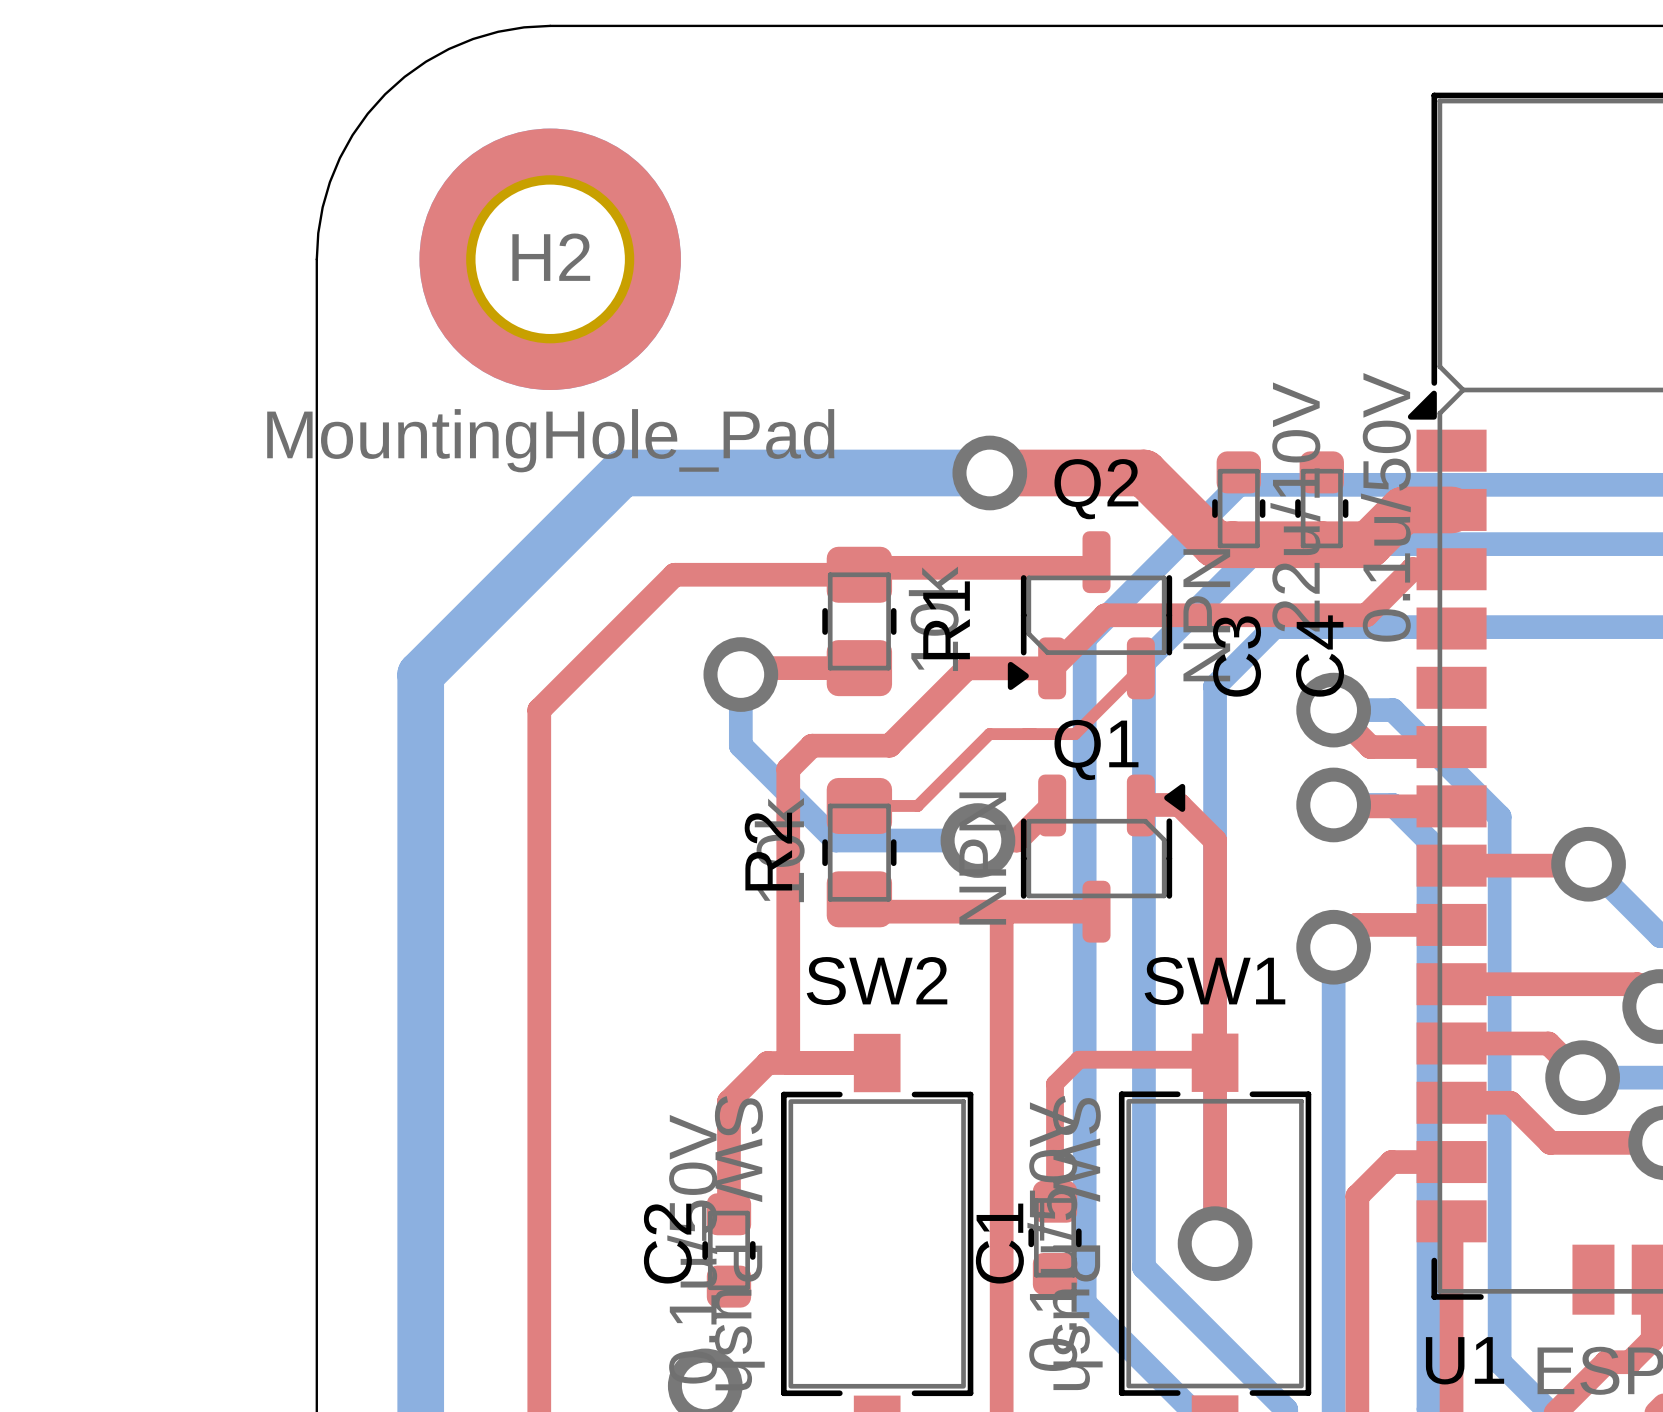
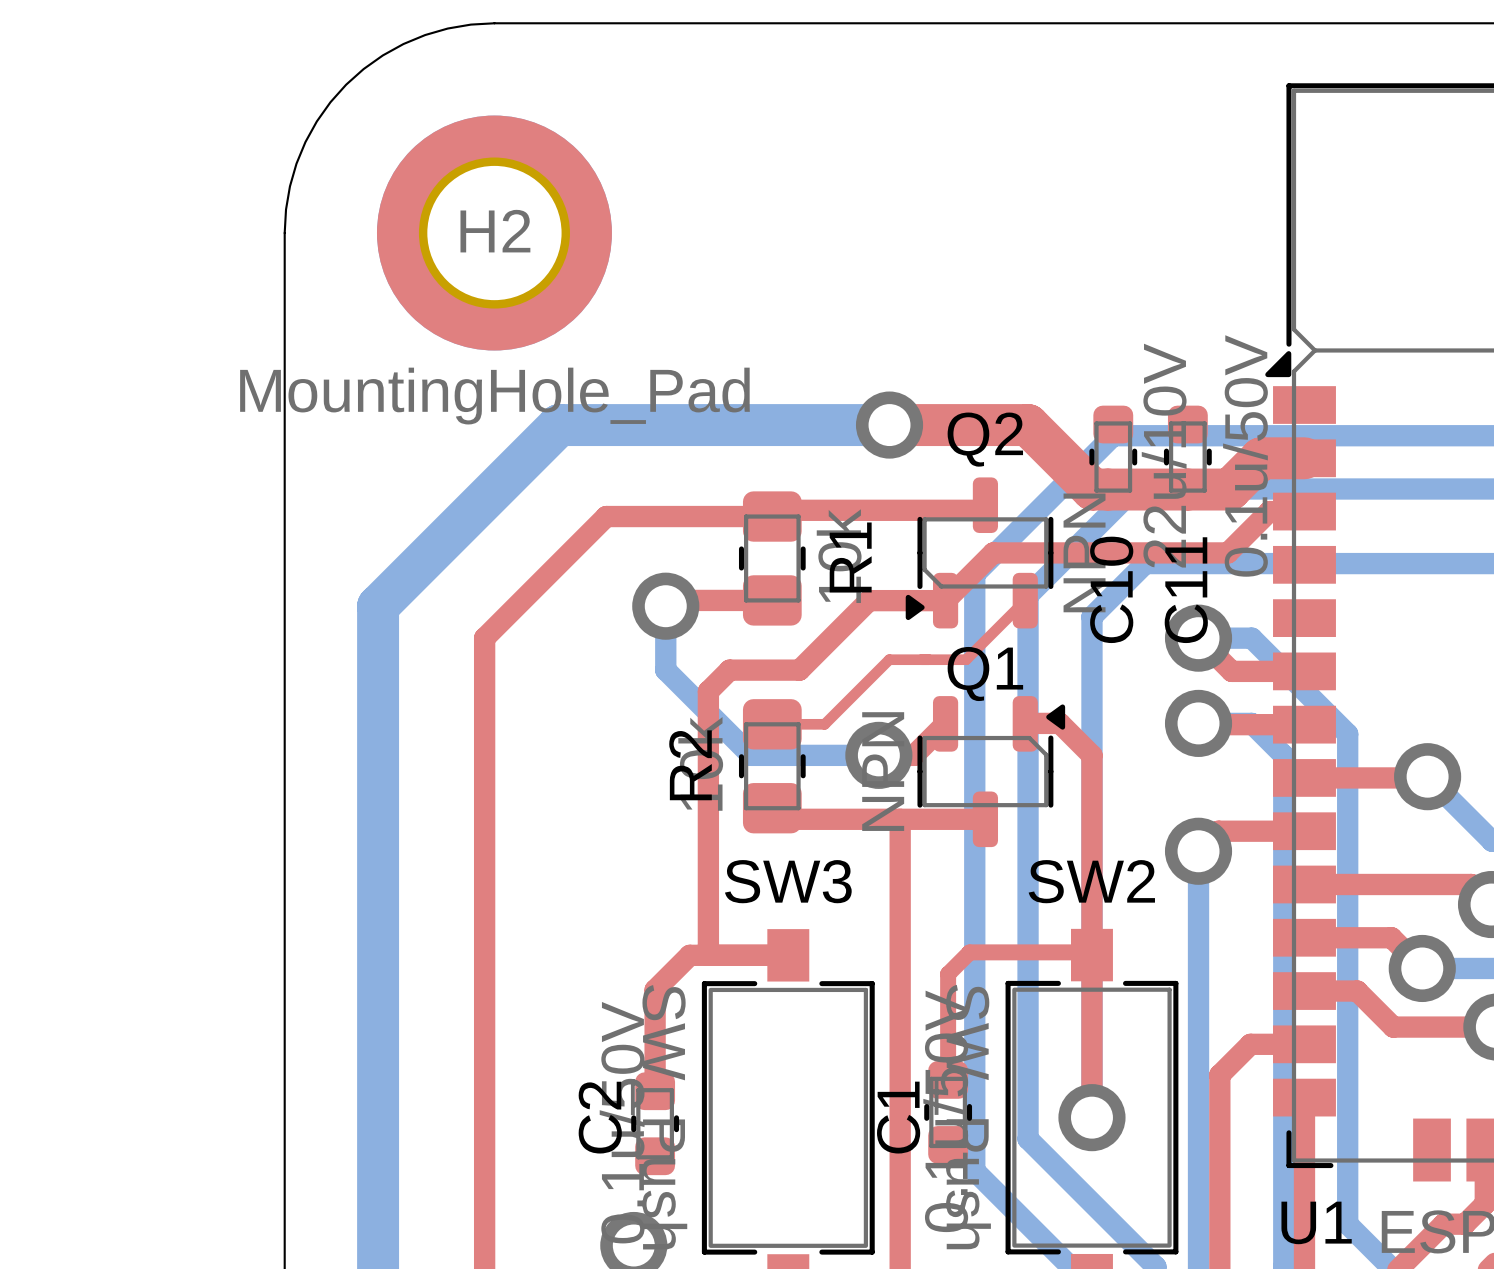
C3 name: C3 (1237, 656) -> C10 (1111, 589)
C4 name: C4 (1320, 656) -> C11 (1186, 590)
SW2 name: SW2 (877, 981) -> SW3 (788, 881)
SW1 name: SW1 (1214, 981) -> SW2 (1091, 881)

